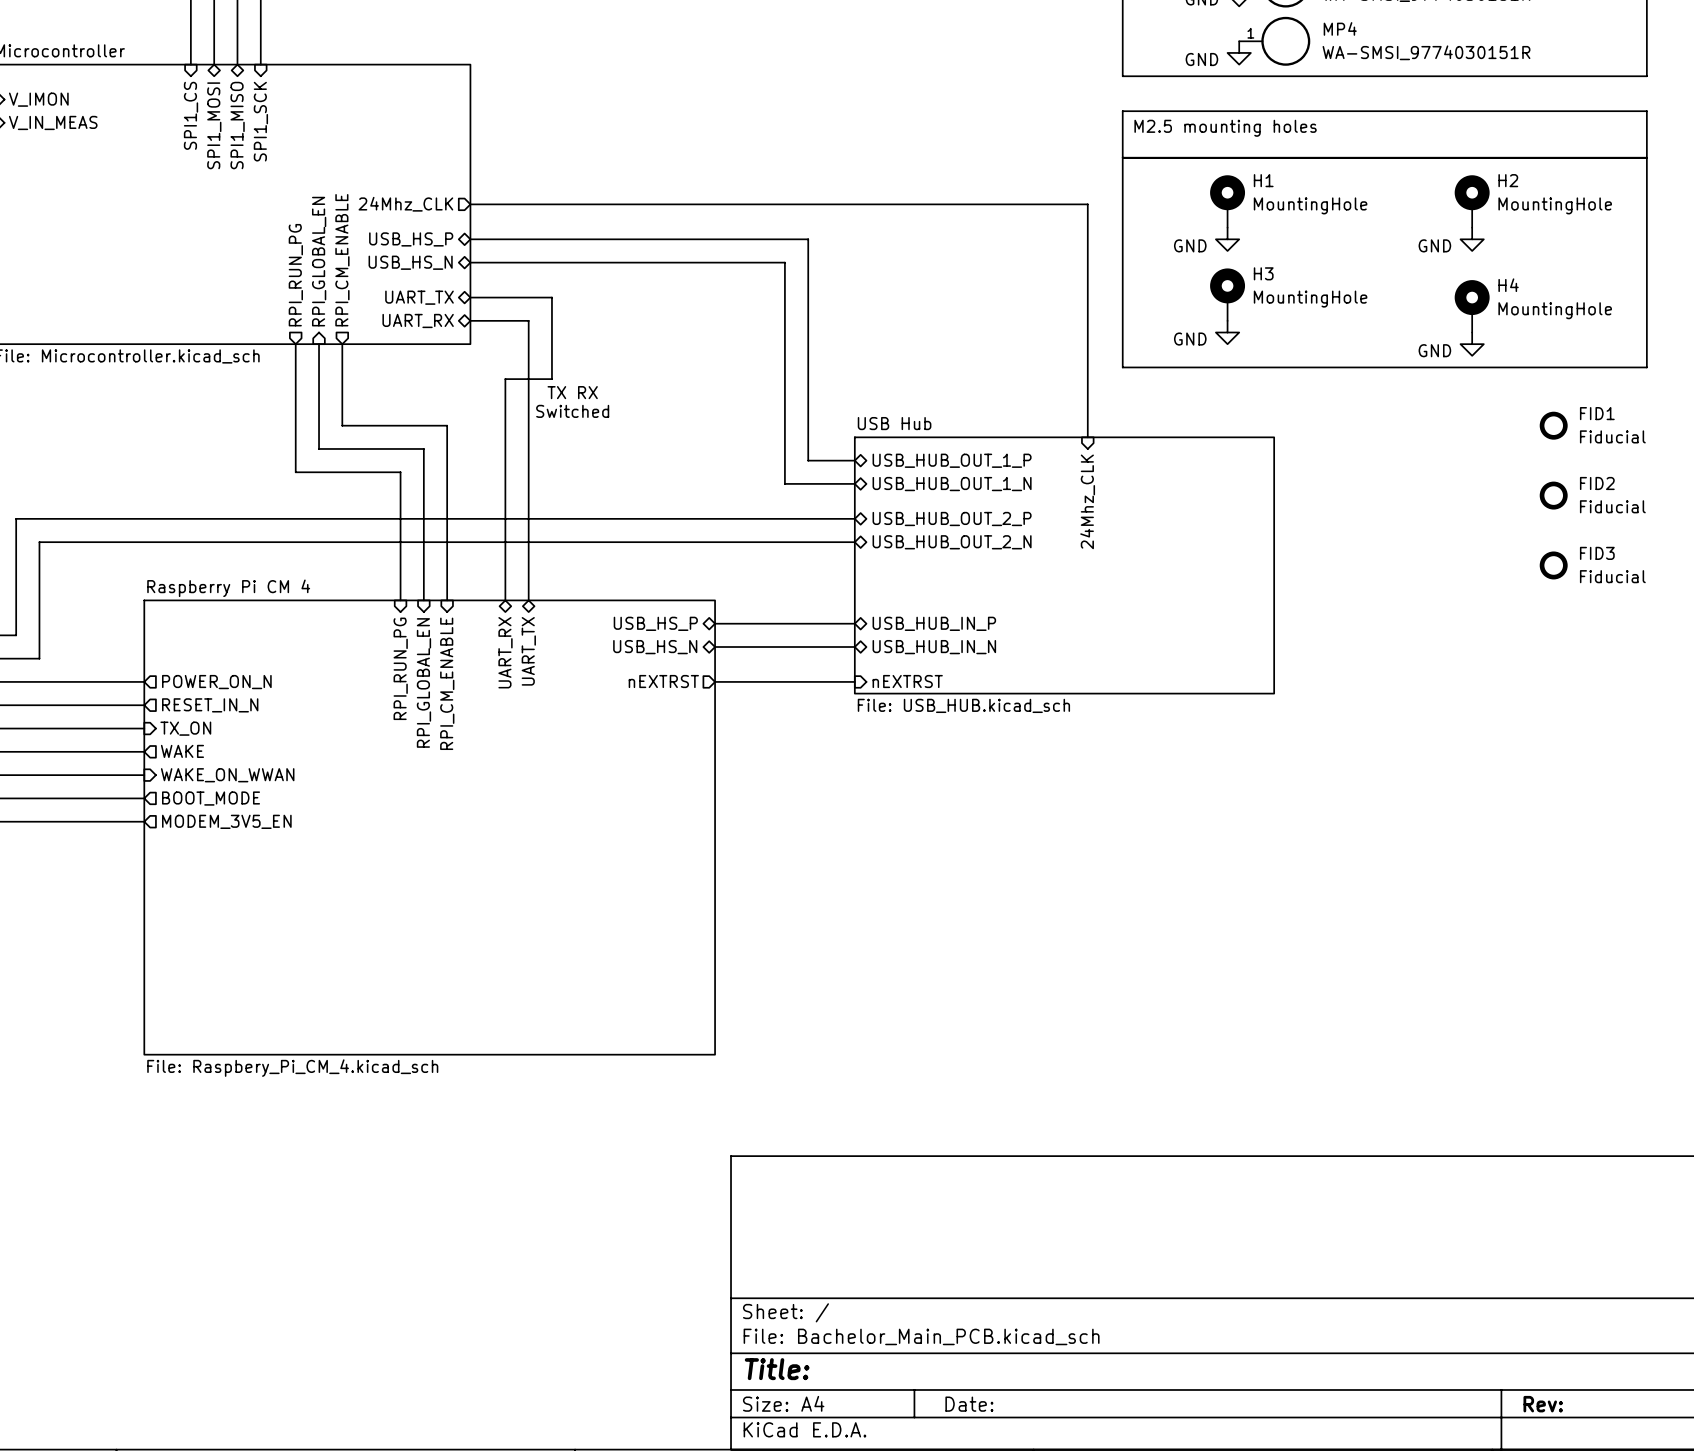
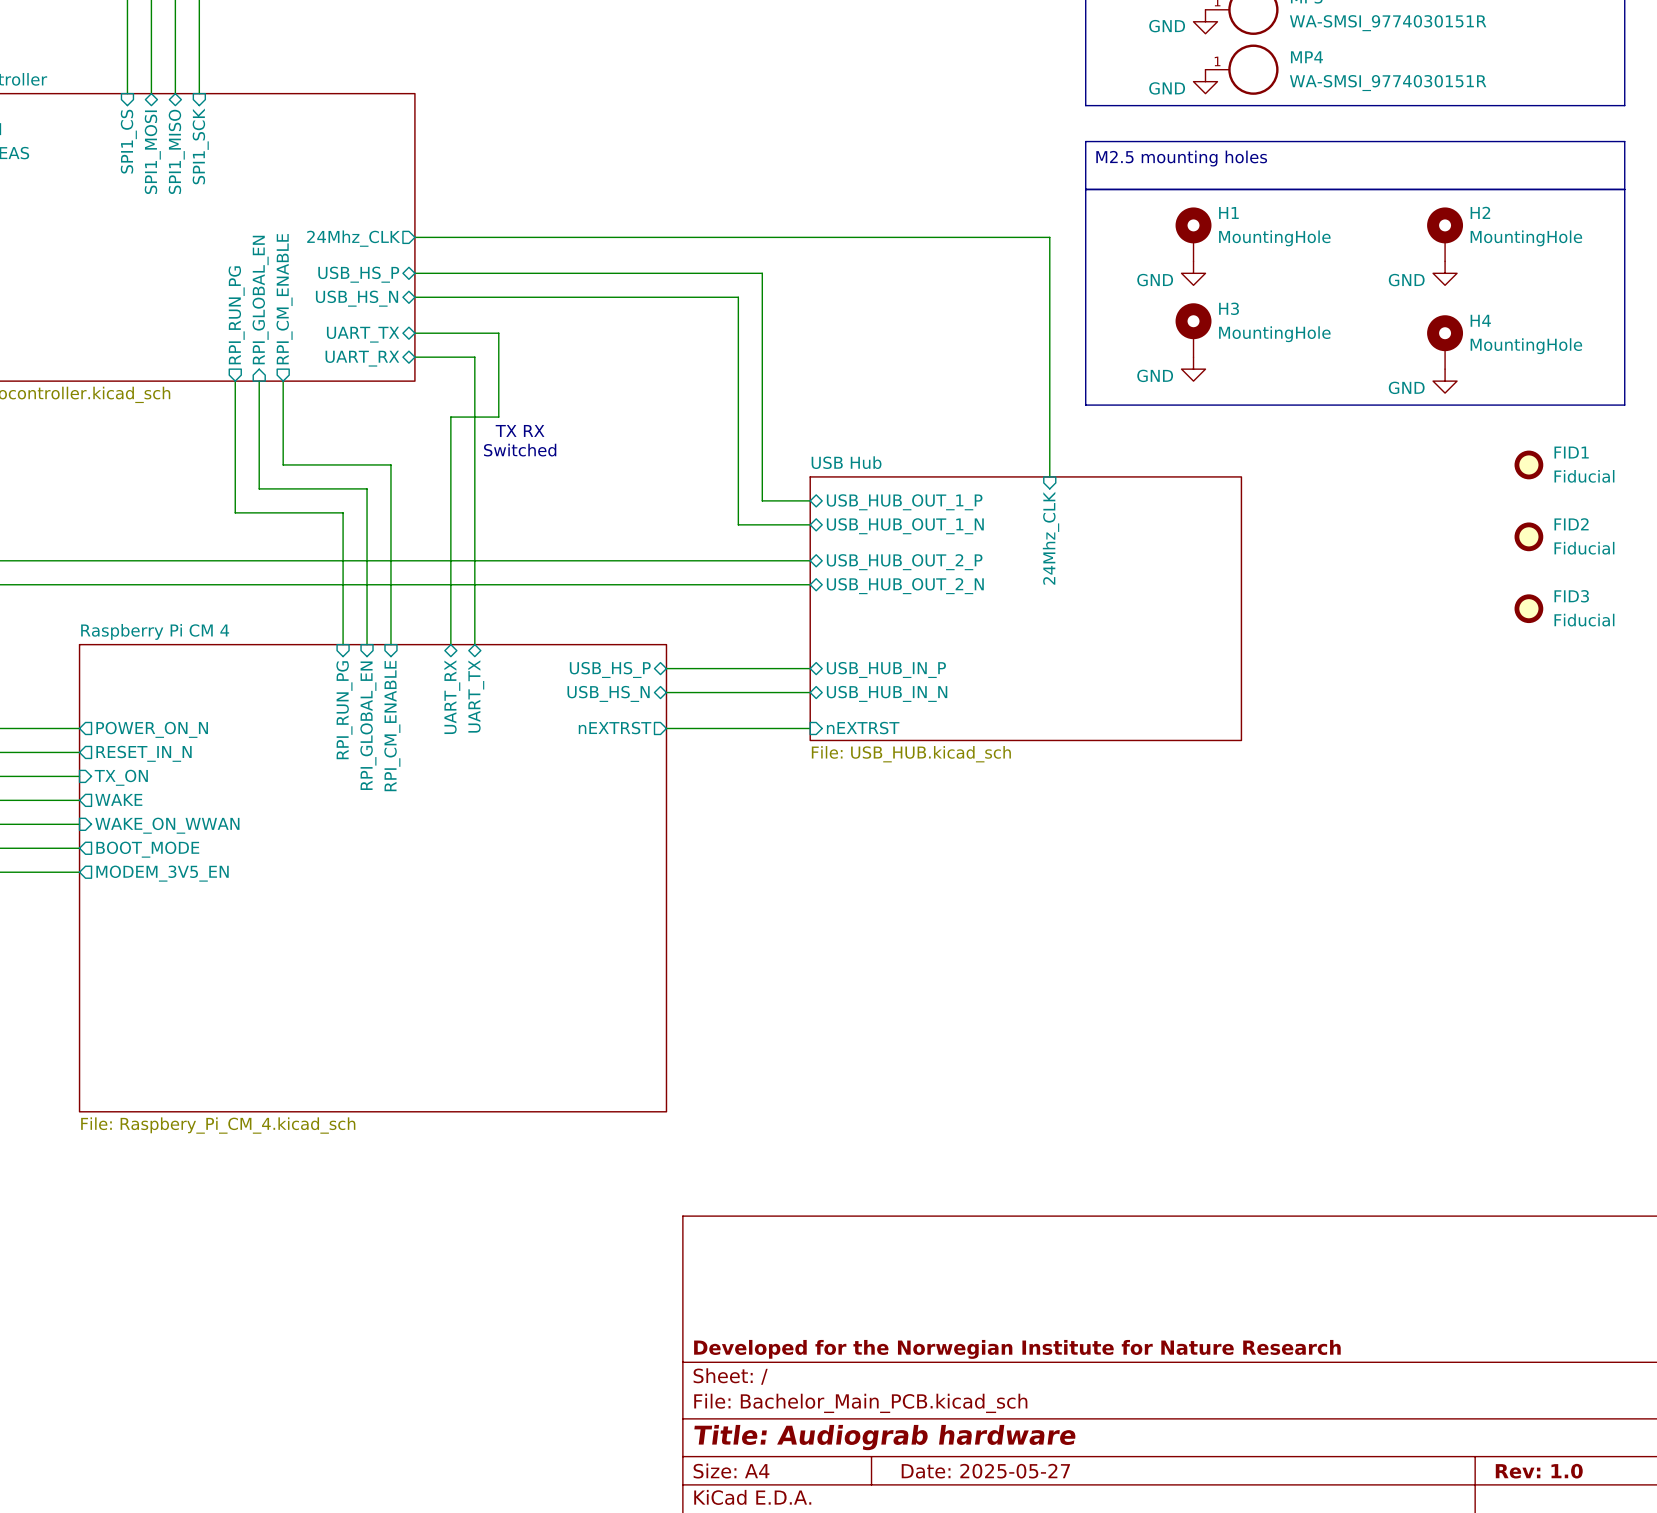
title block: none -> Developed for the Norwegian Institute for Nature Research (1017, 1349)
title block: Title: (777, 1369) -> Title: Audiograb hardware (885, 1437)
title block: Date: (969, 1404) -> Date: 2025-05-27 (985, 1471)
title block: Rev: (1543, 1404) -> Rev: 1.0 (1539, 1471)

